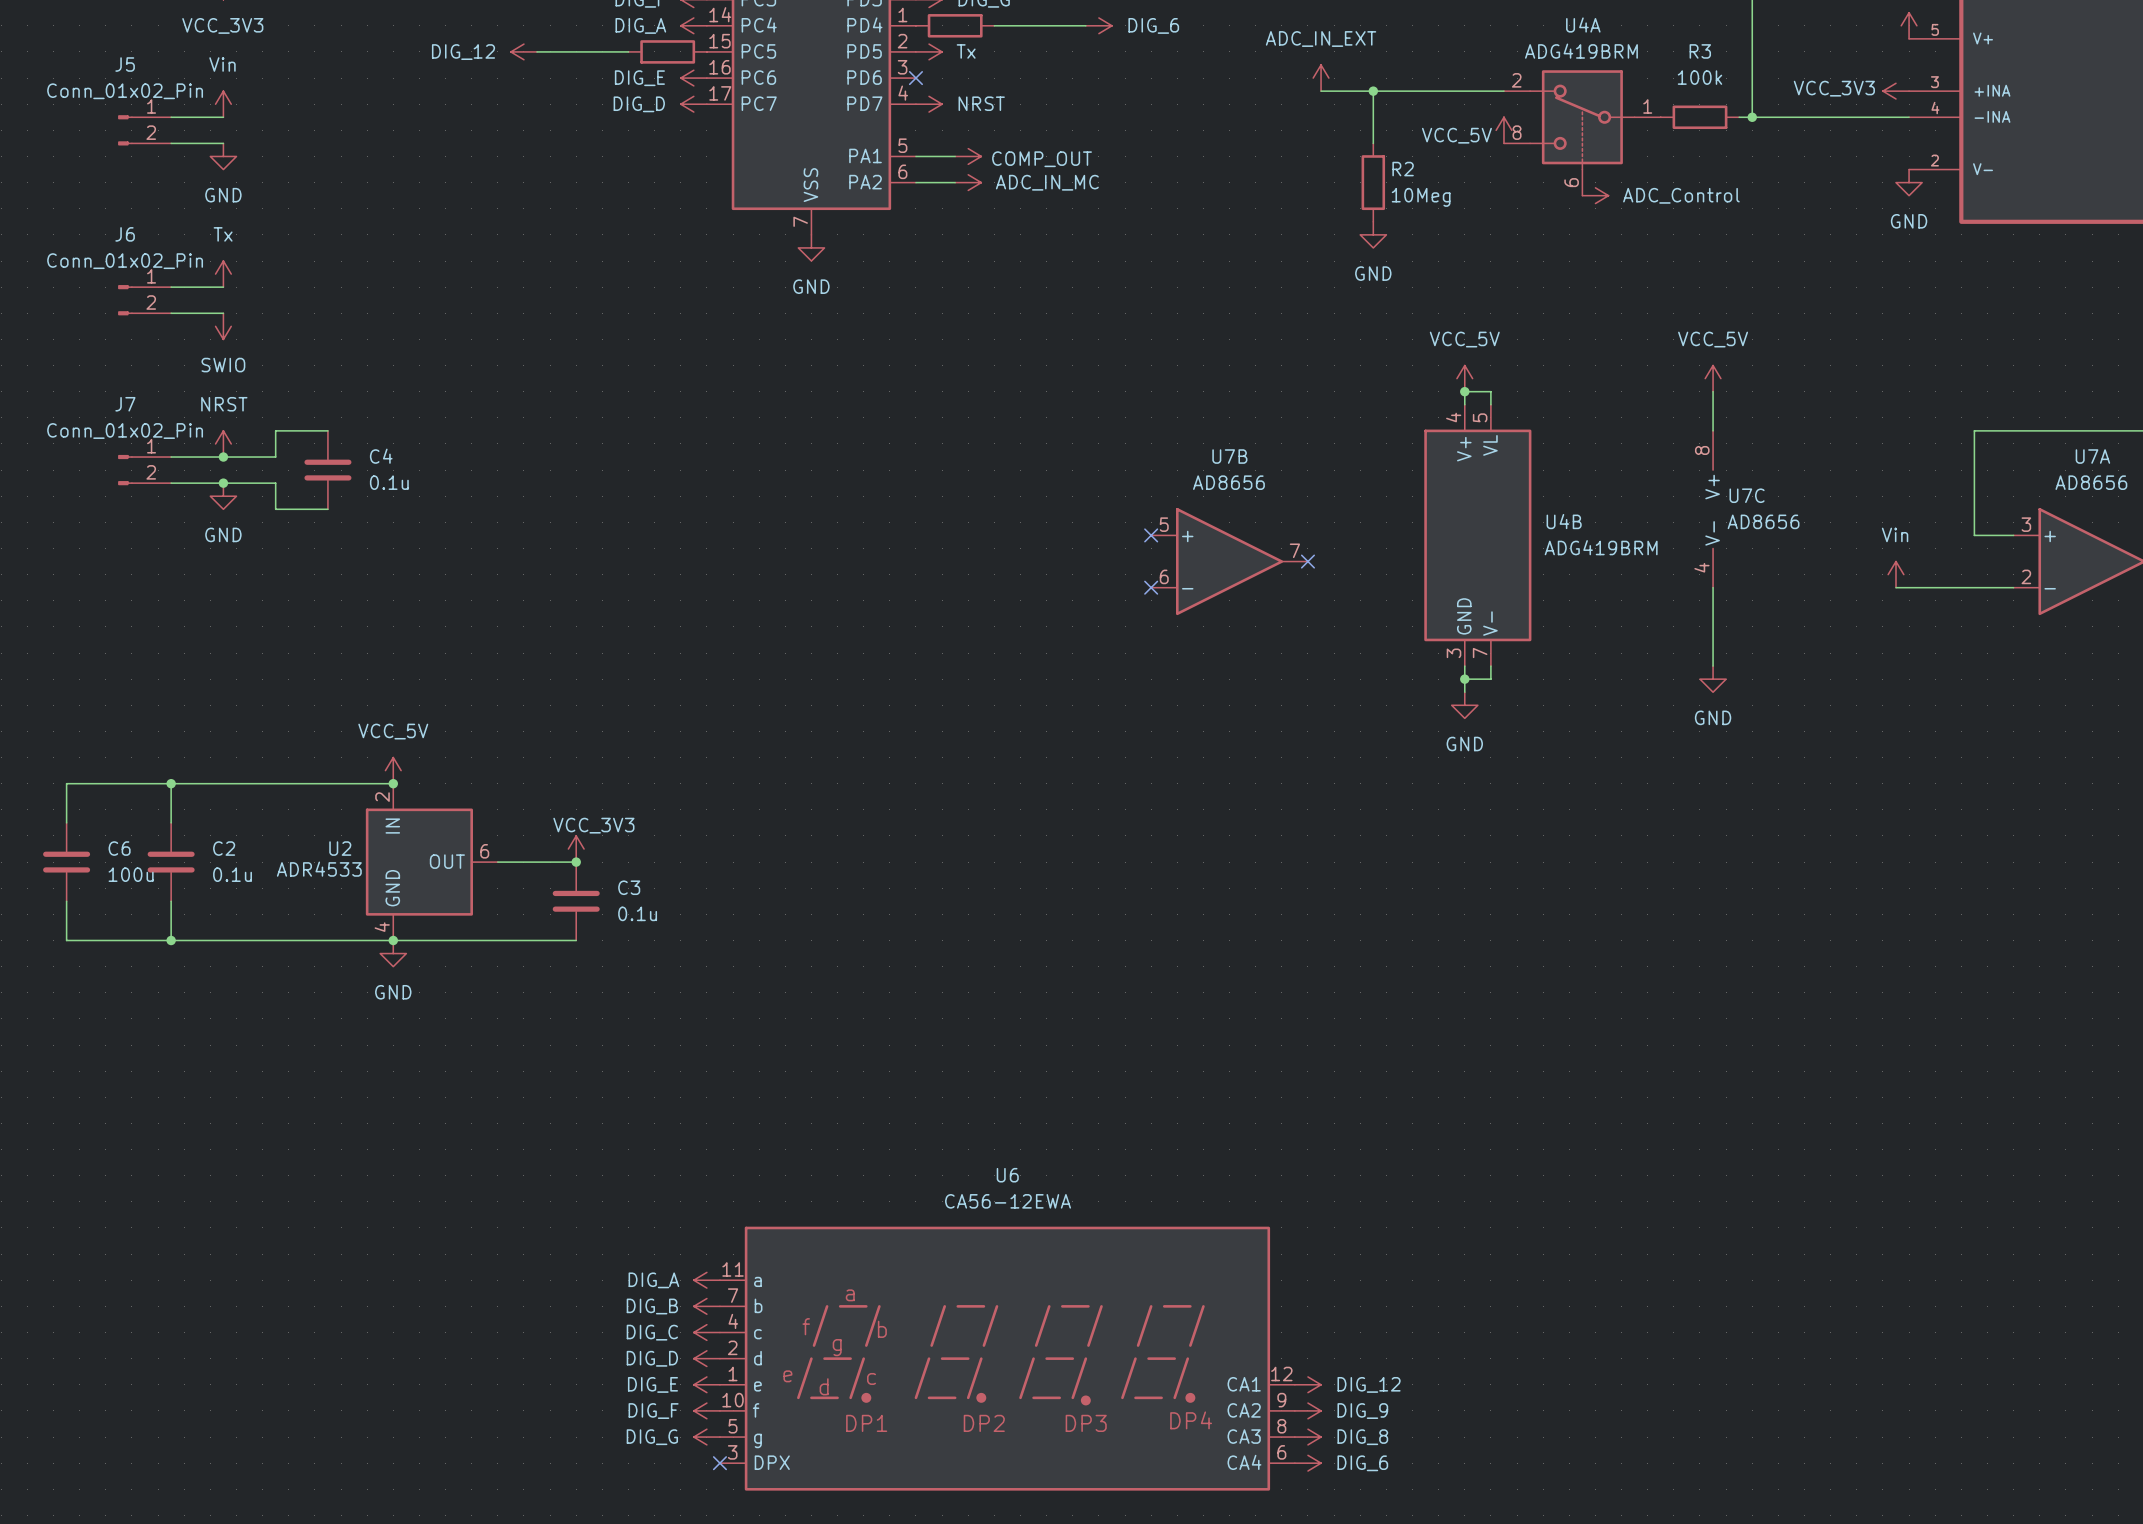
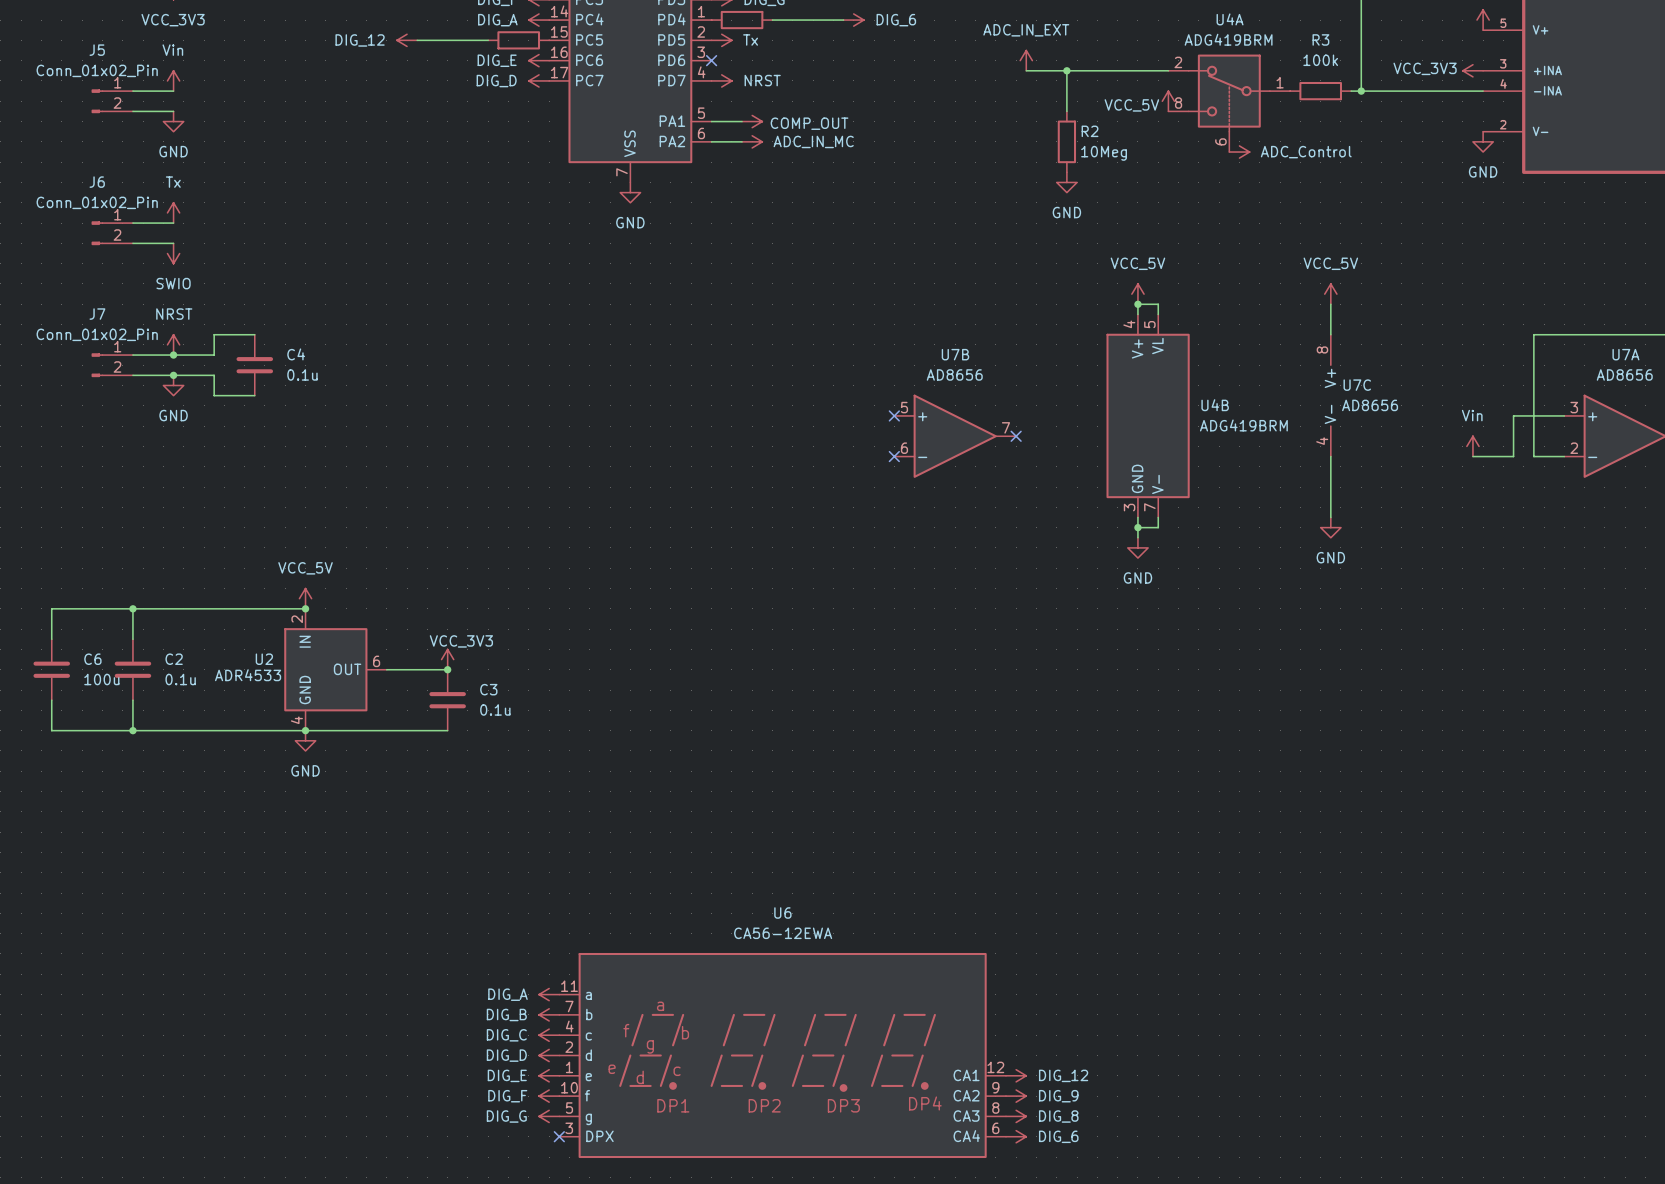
wire: (1948, 587) (1974, 587) -> (1513, 456) (1513, 415) (1533, 415) (1533, 456)

